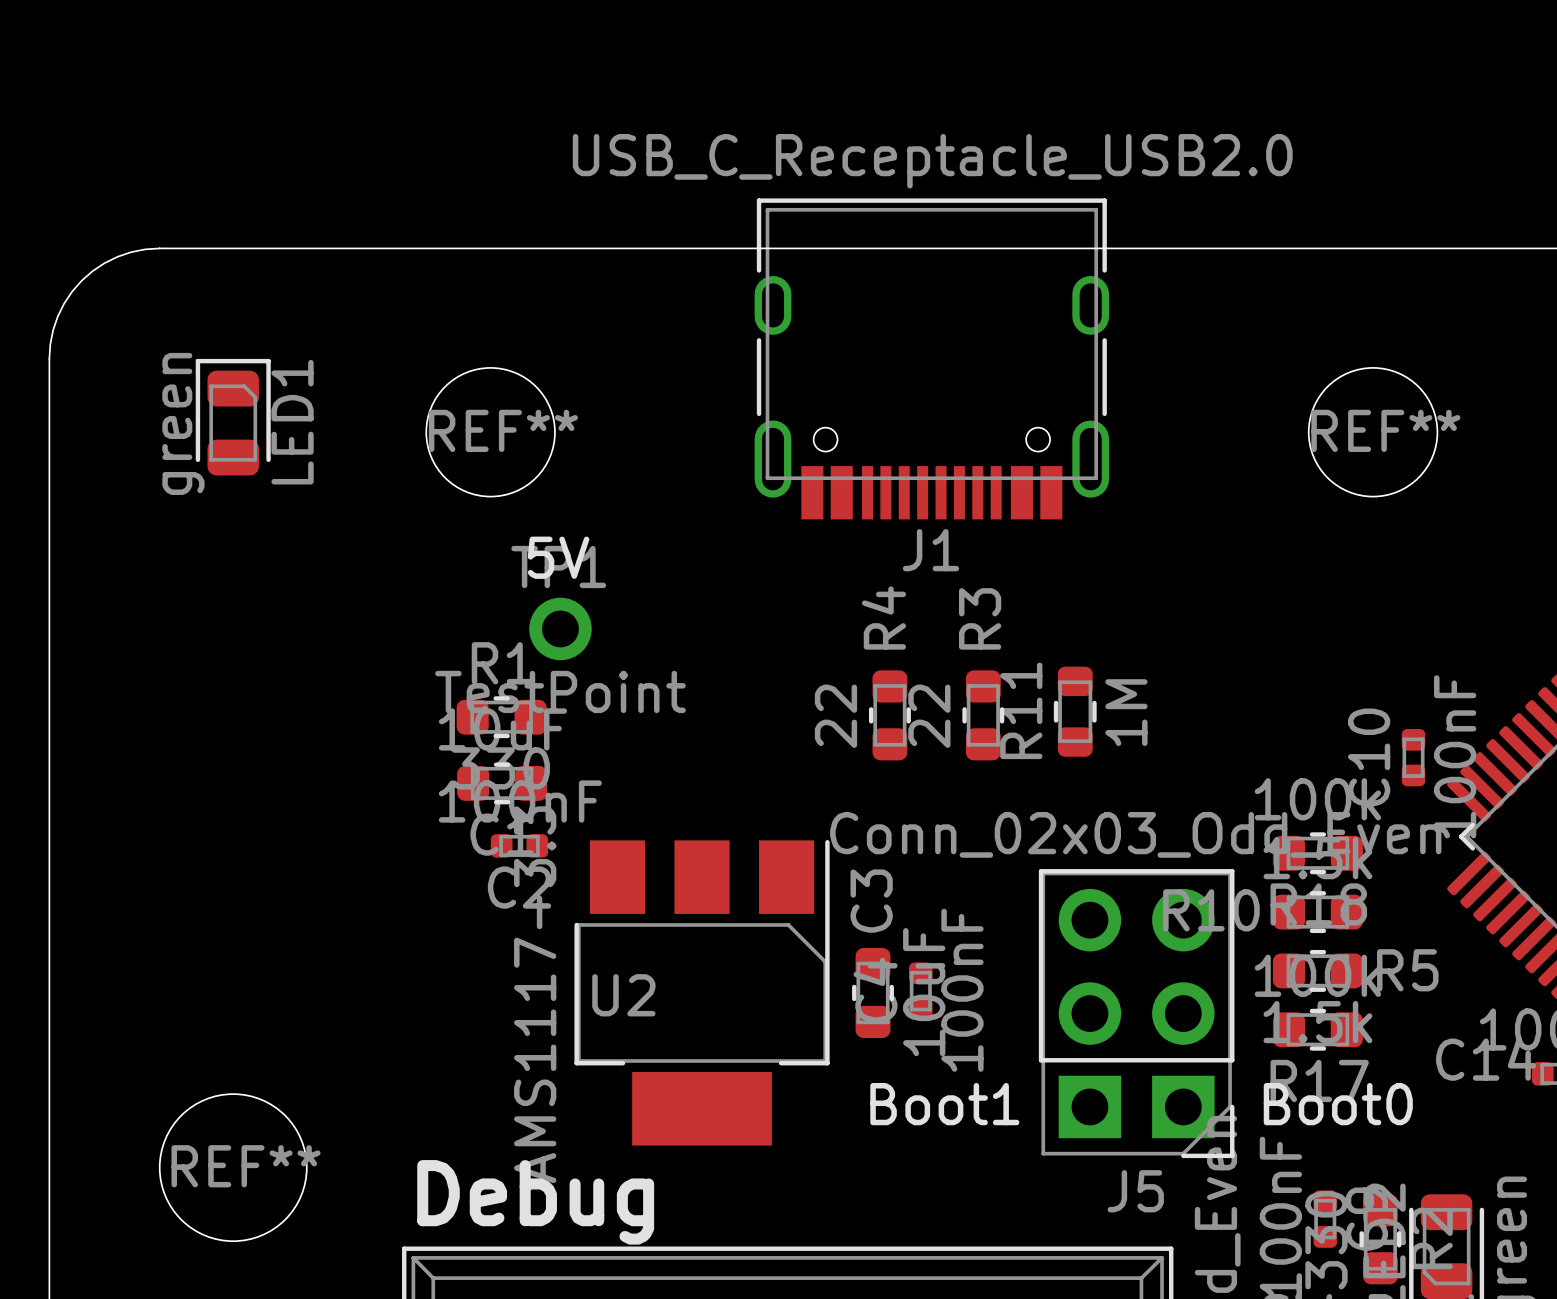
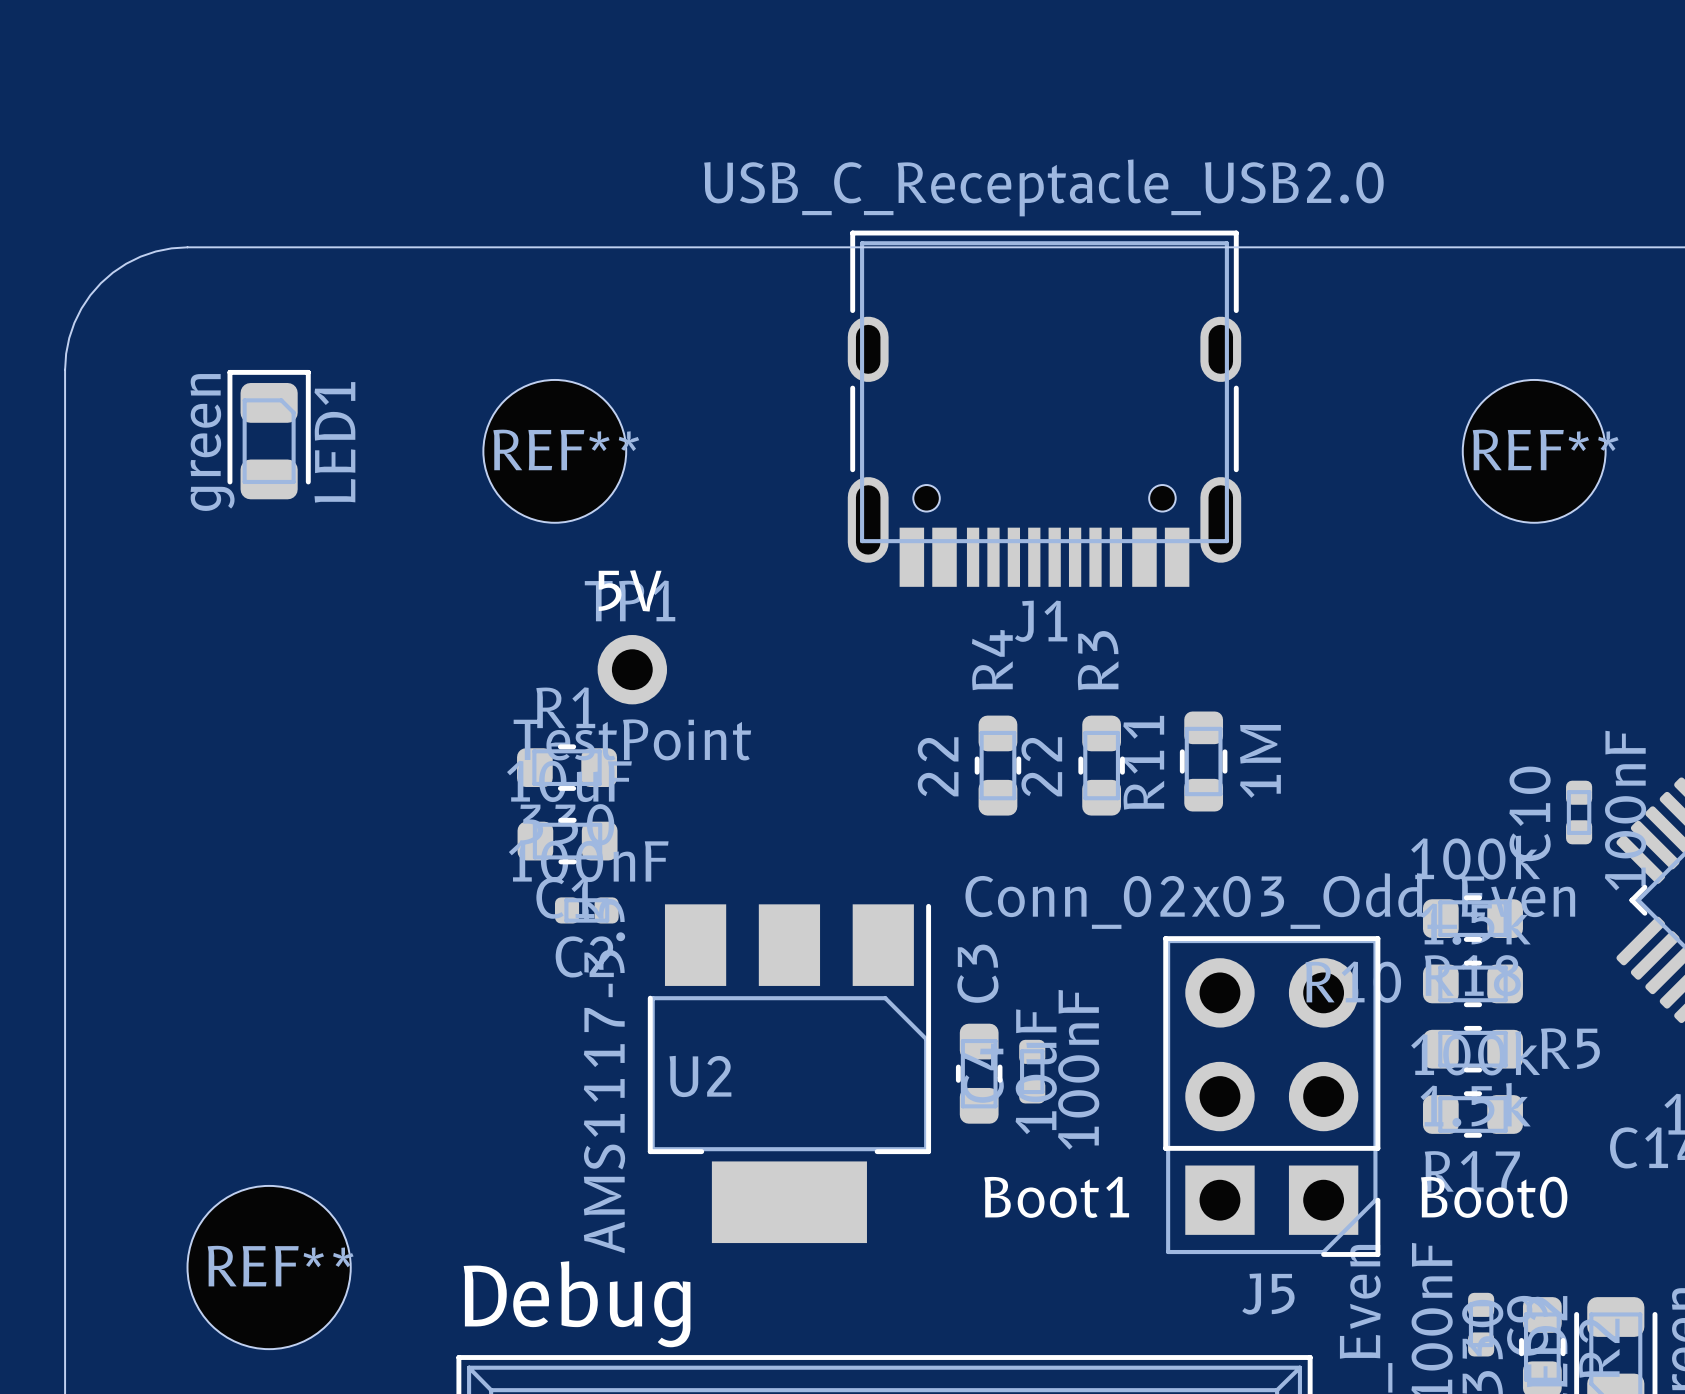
J1 position: (931, 358) -> (1044, 408)

